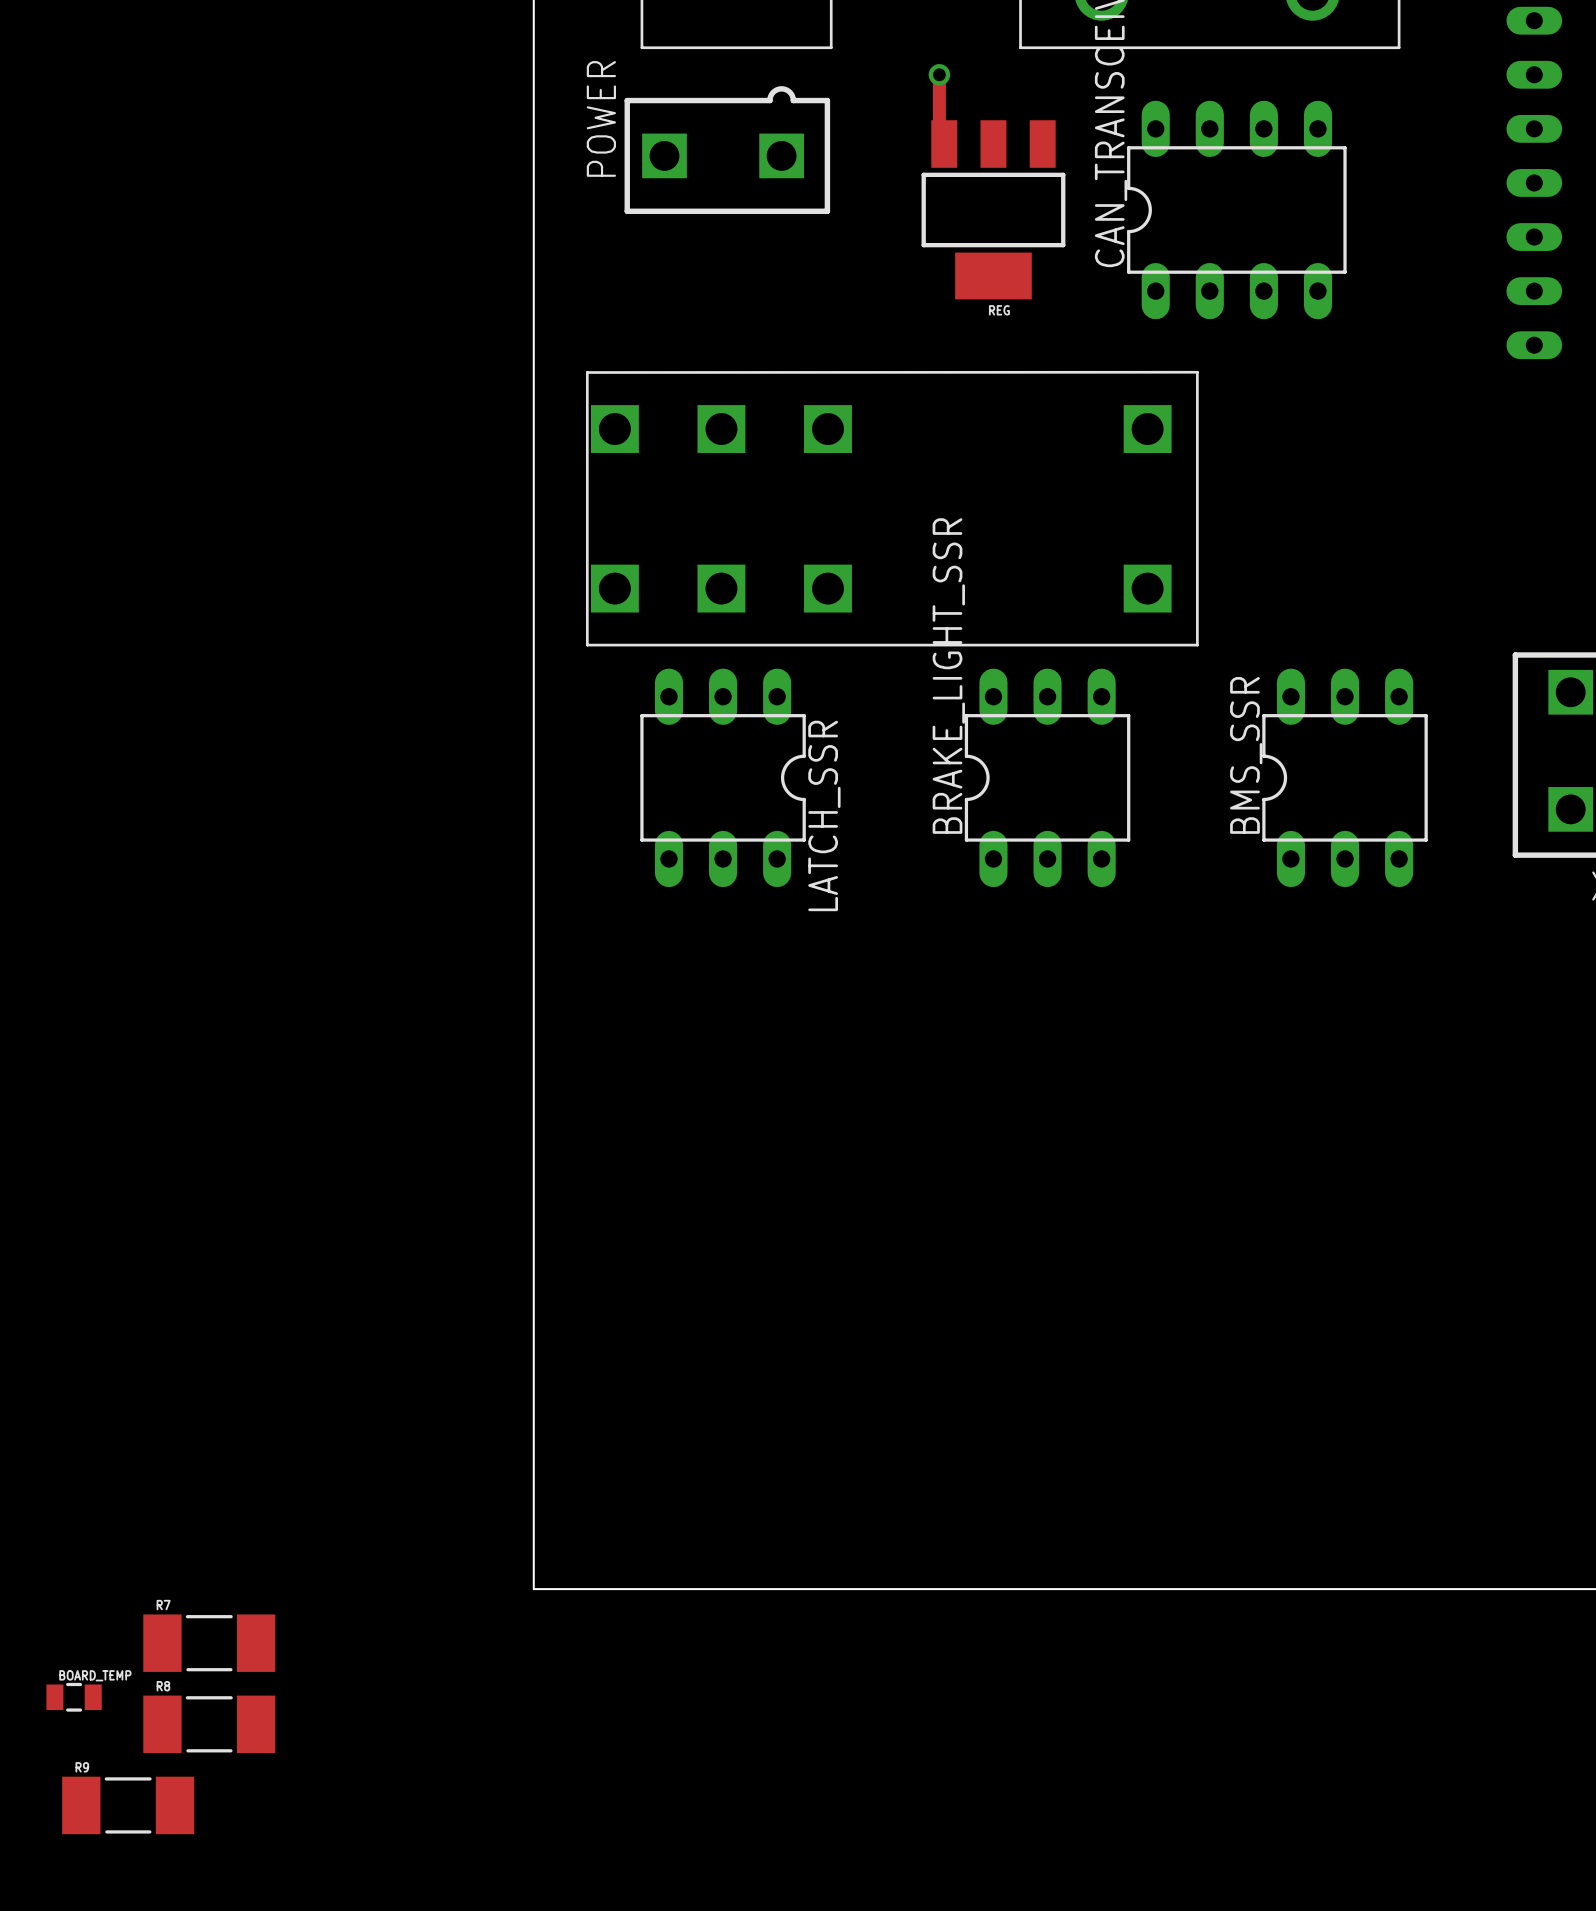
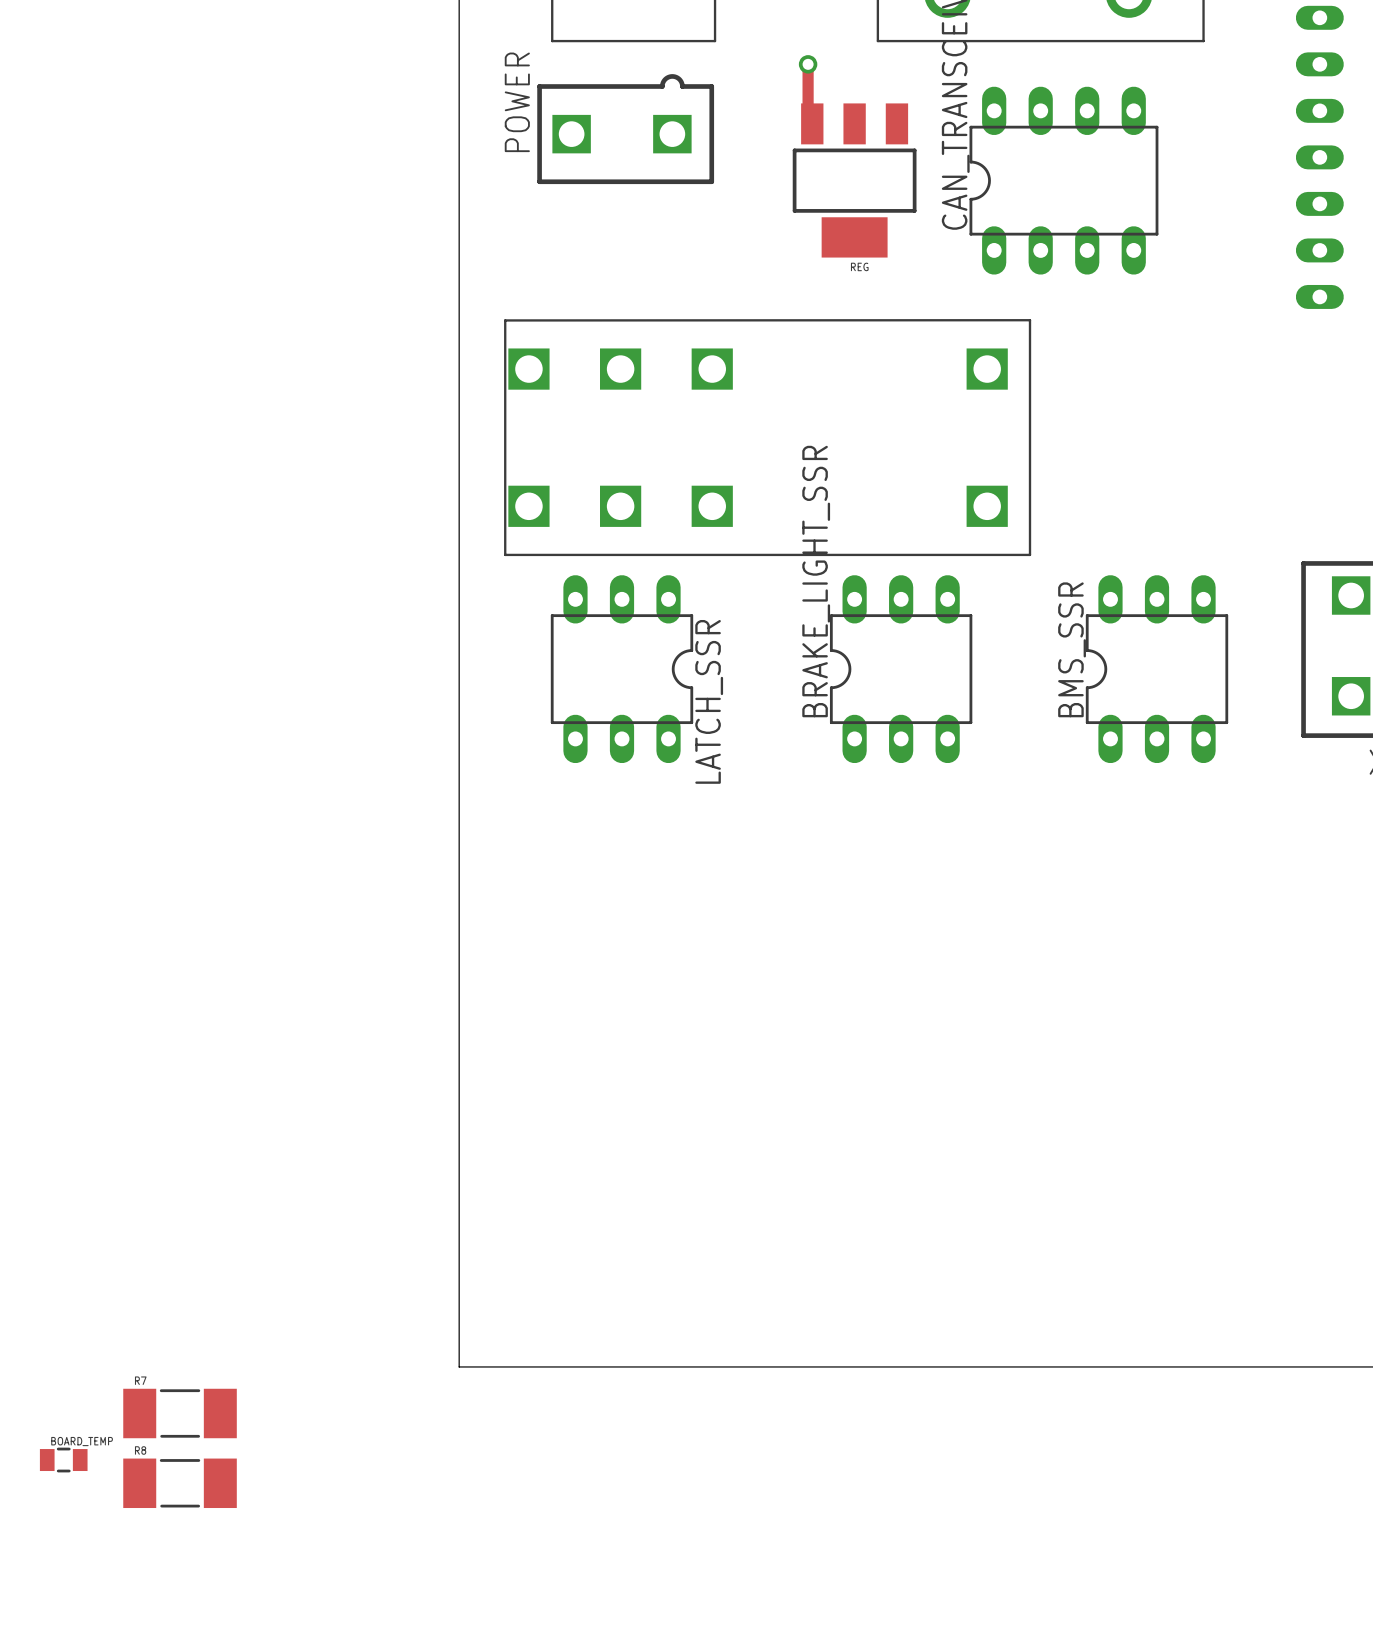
R9: (128, 1805) -> none

